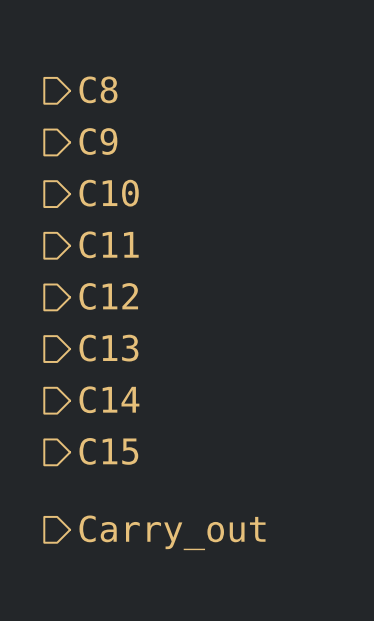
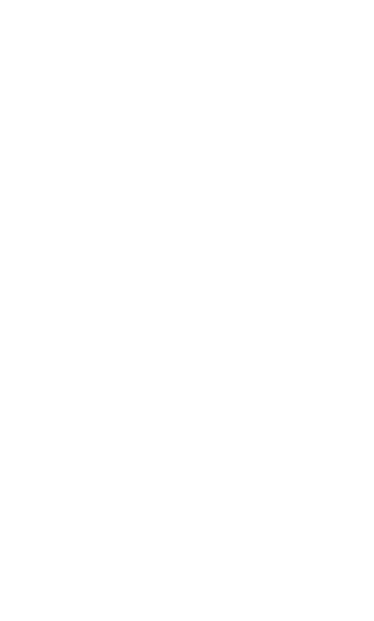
hierarchical label: C8 (98, 89) -> none
hierarchical label: C9 (98, 141) -> none
hierarchical label: C10 (109, 193) -> none
hierarchical label: C11 (109, 244) -> none
hierarchical label: C12 (108, 296) -> none
hierarchical label: C13 (108, 348) -> none
hierarchical label: C14 (109, 399) -> none
hierarchical label: C15 (108, 451) -> none
hierarchical label: Carry_out (172, 532) -> none

